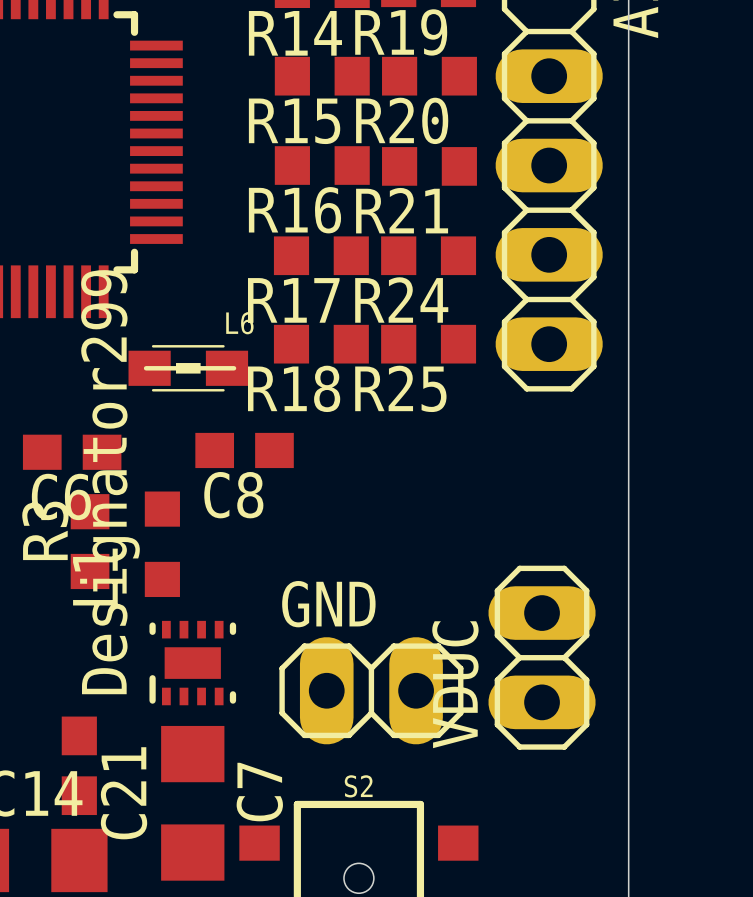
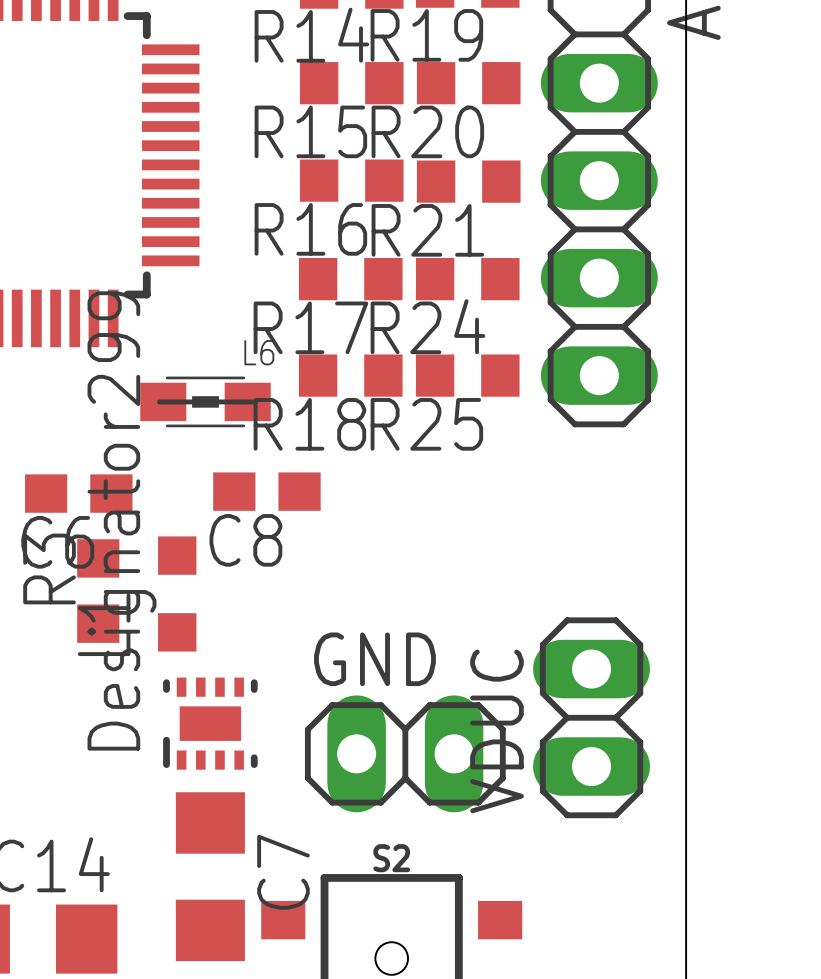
C21: (79, 765) -> none

